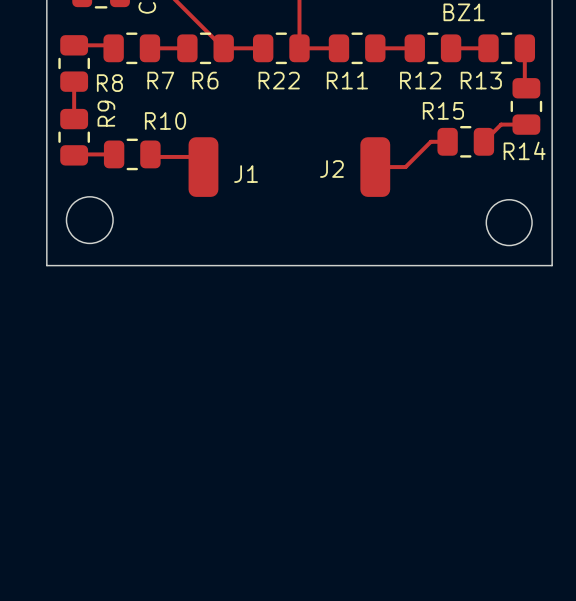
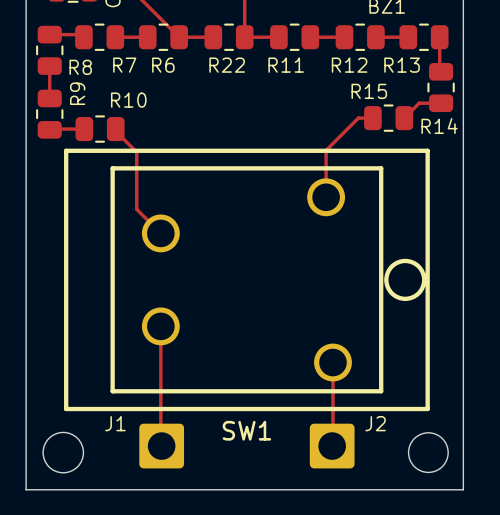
J1 footprint: [188, 137, 219, 197] -> [139, 423, 185, 469]
J2 footprint: [360, 137, 391, 197] -> [309, 423, 355, 469]
track: (150, 156) (193, 156) (203, 167) -> (115, 131) (136, 152) (136, 209) (160, 233)
track: (375, 167) (405, 167) -> (326, 197) (326, 150) (336, 139)
J2 name position: J2 (331, 169) -> J2 (375, 423)
J1 name position: J1 (246, 174) -> J1 (115, 423)
round board edge position: (89, 220) -> (63, 452)
round board edge position: (509, 222) -> (428, 452)
board edge: (46, 265) (552, 265) -> (26, 225) (26, 489) (463, 489) (463, 225)
SW1: none -> (246, 279)
track: none -> (160, 326) (161, 446)
track: none -> (332, 362) (332, 446)

